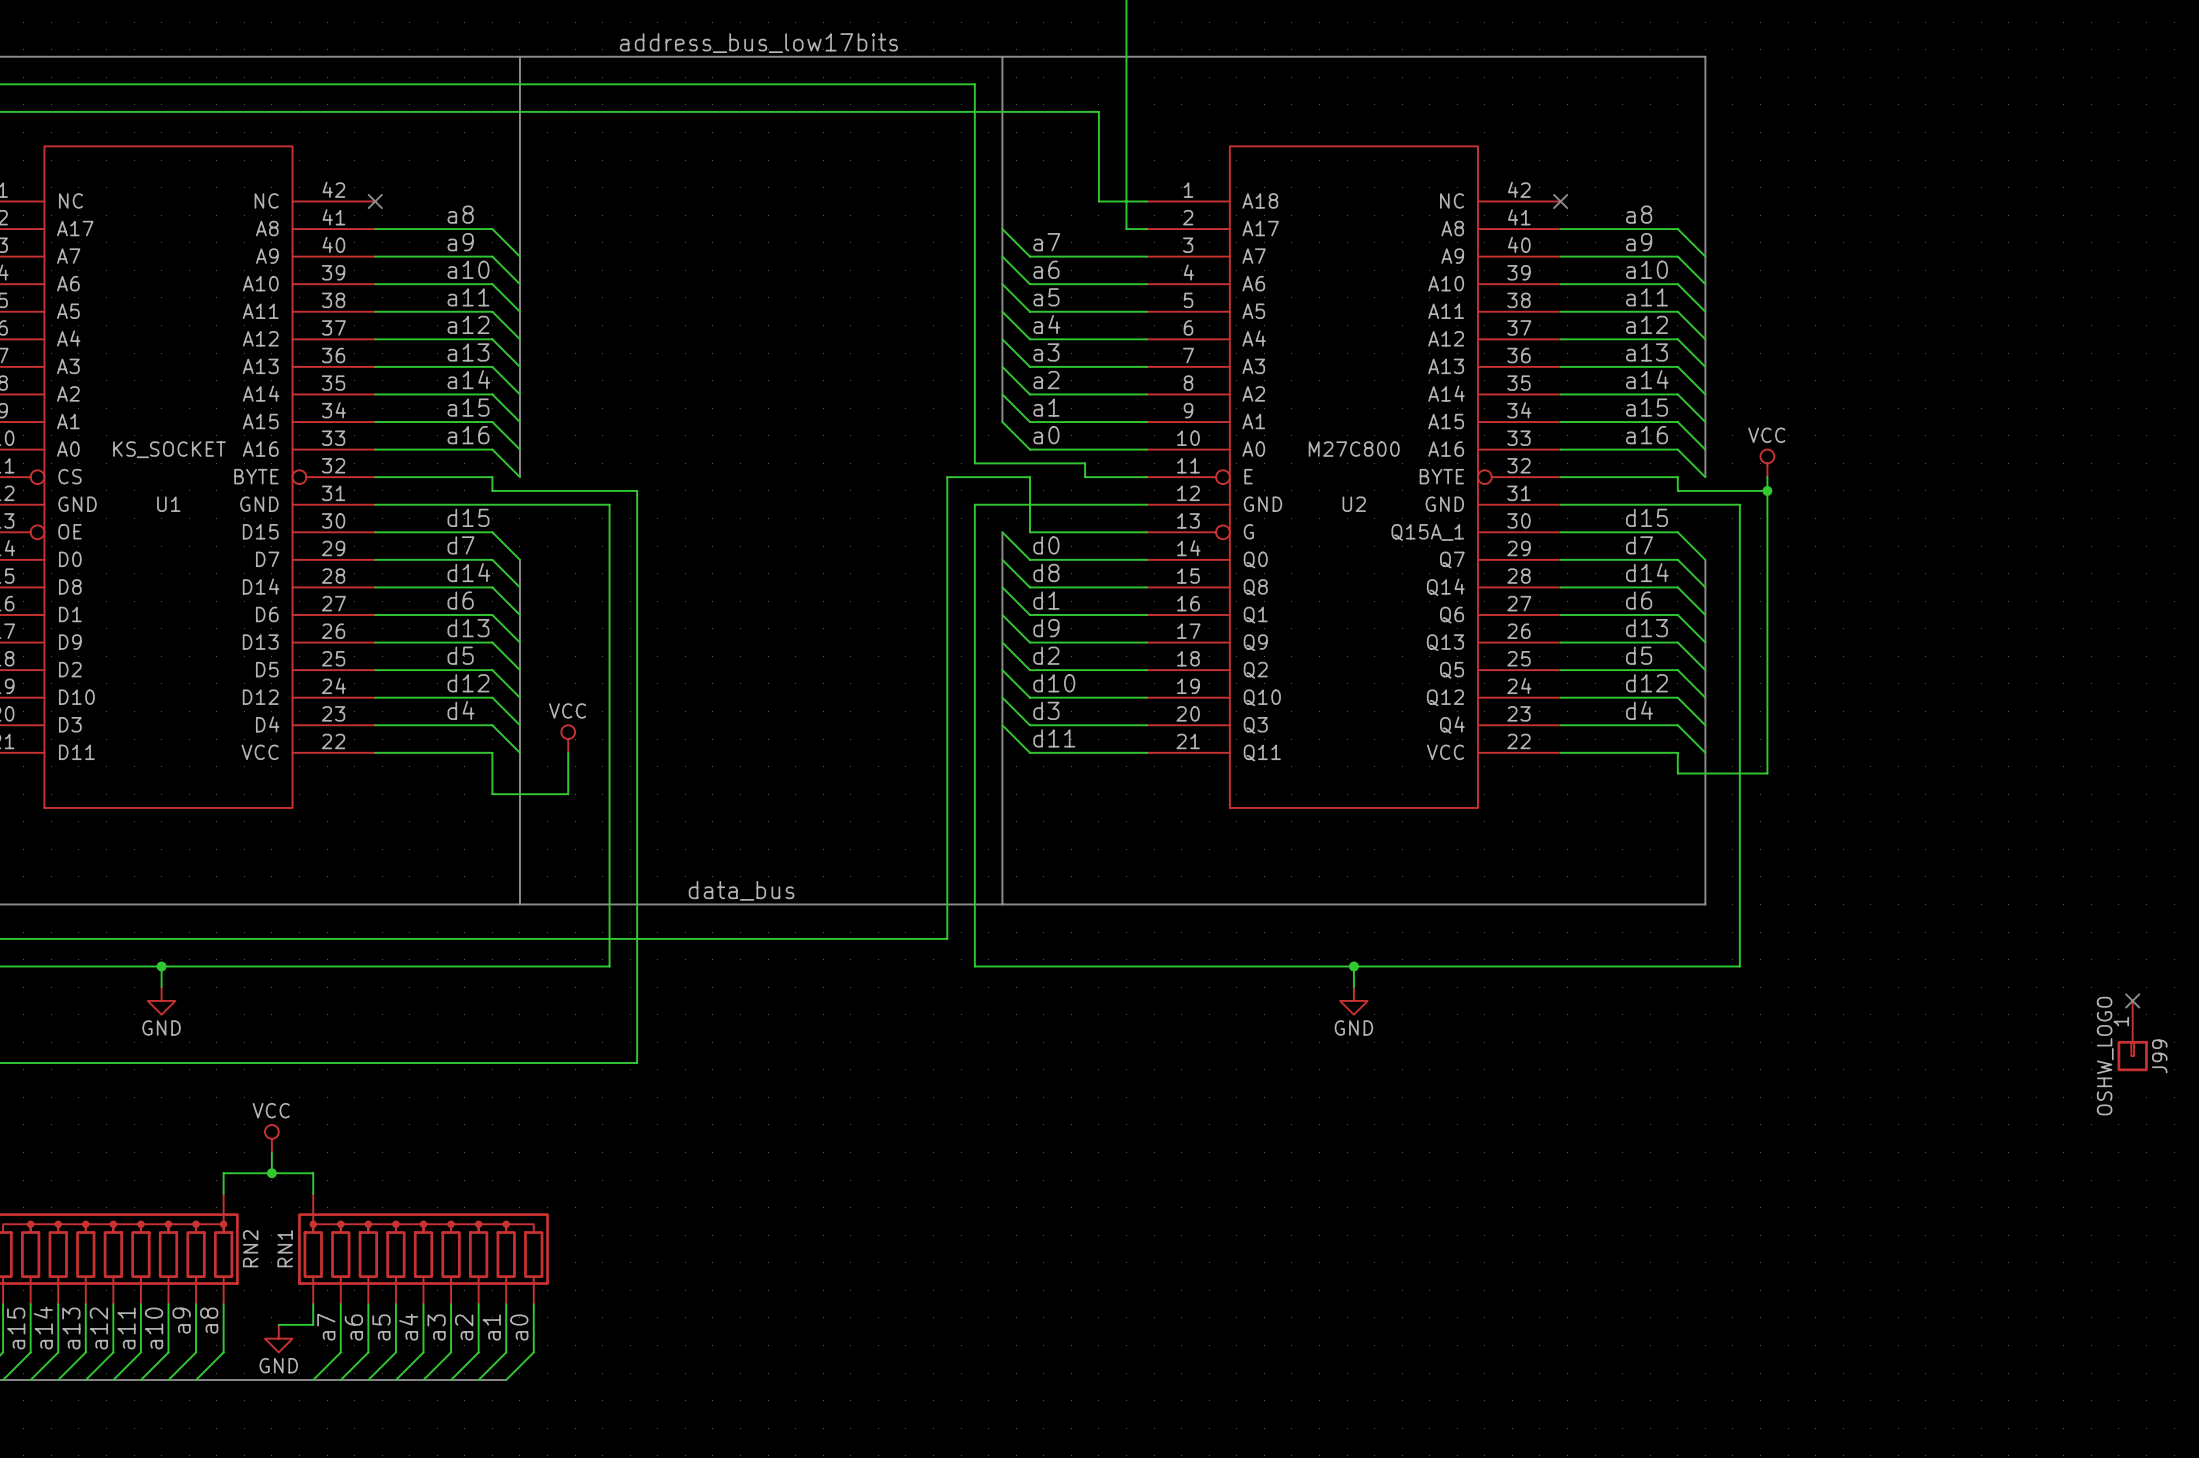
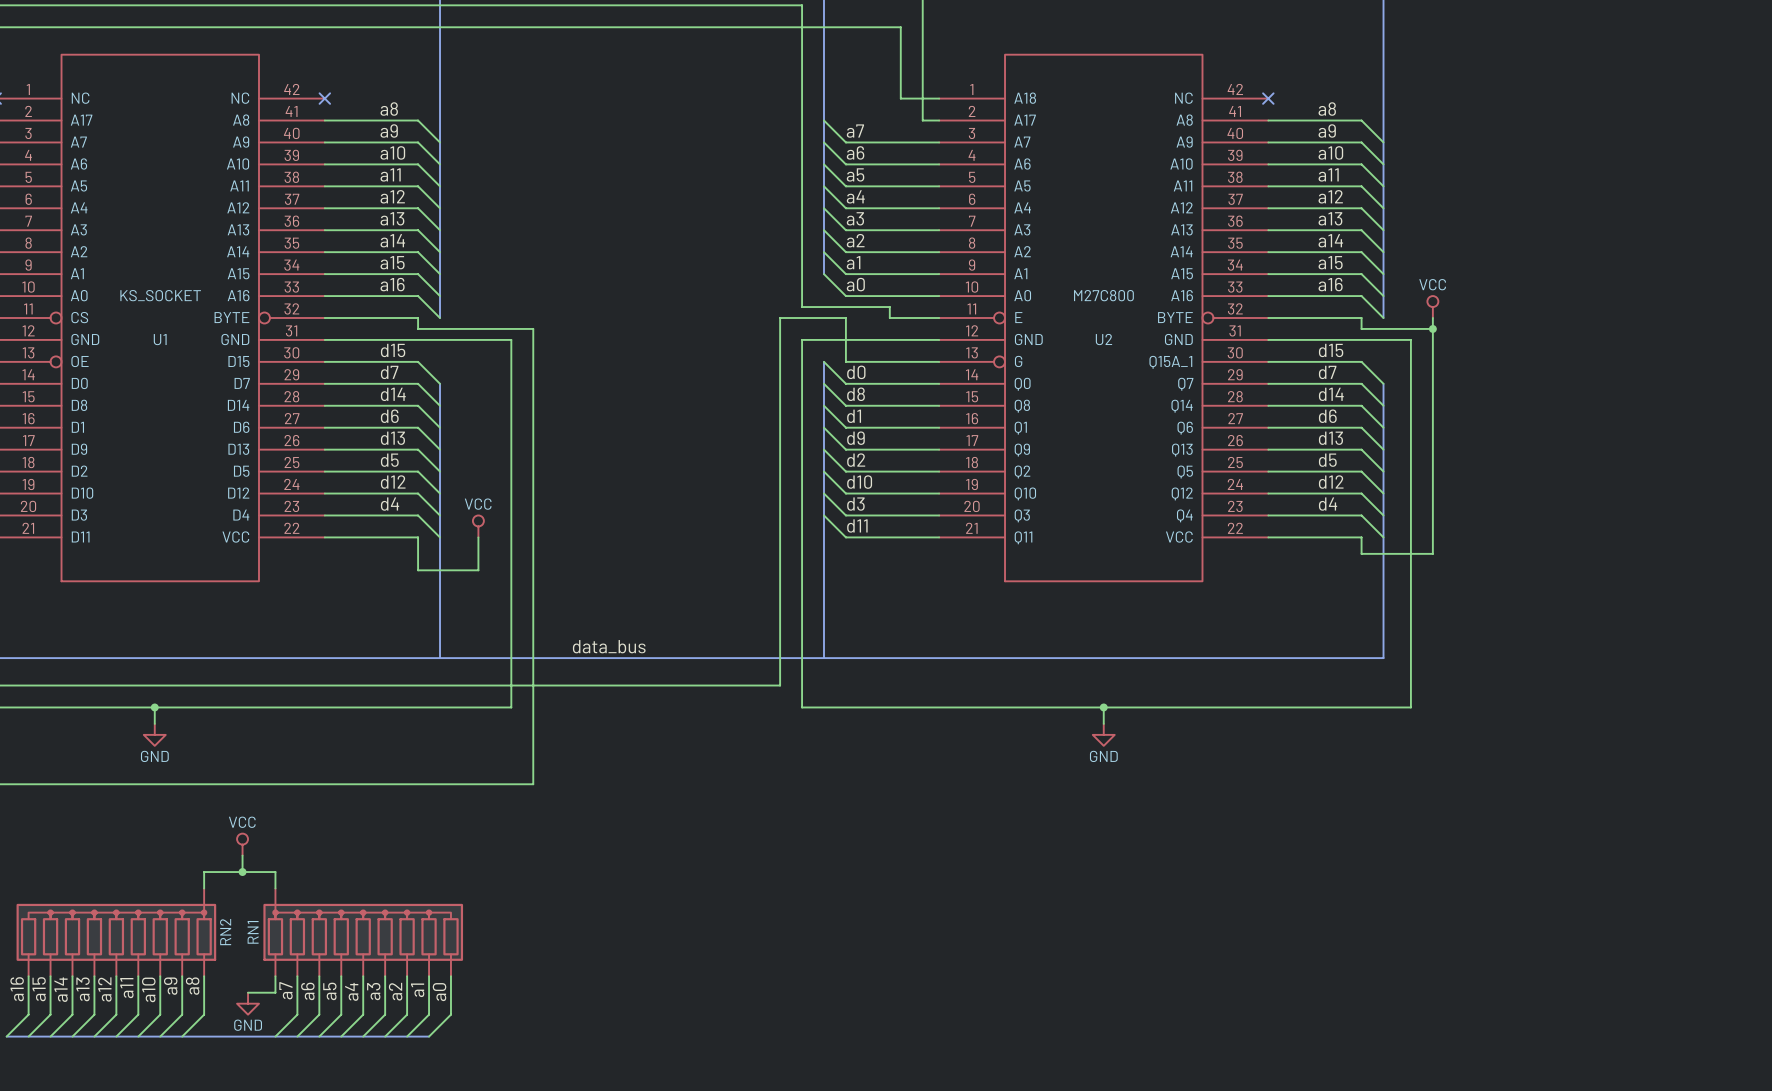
no-connect mark: (2132, 1000) -> none
J99: OSHW_LOGO (2132, 1036) -> none

